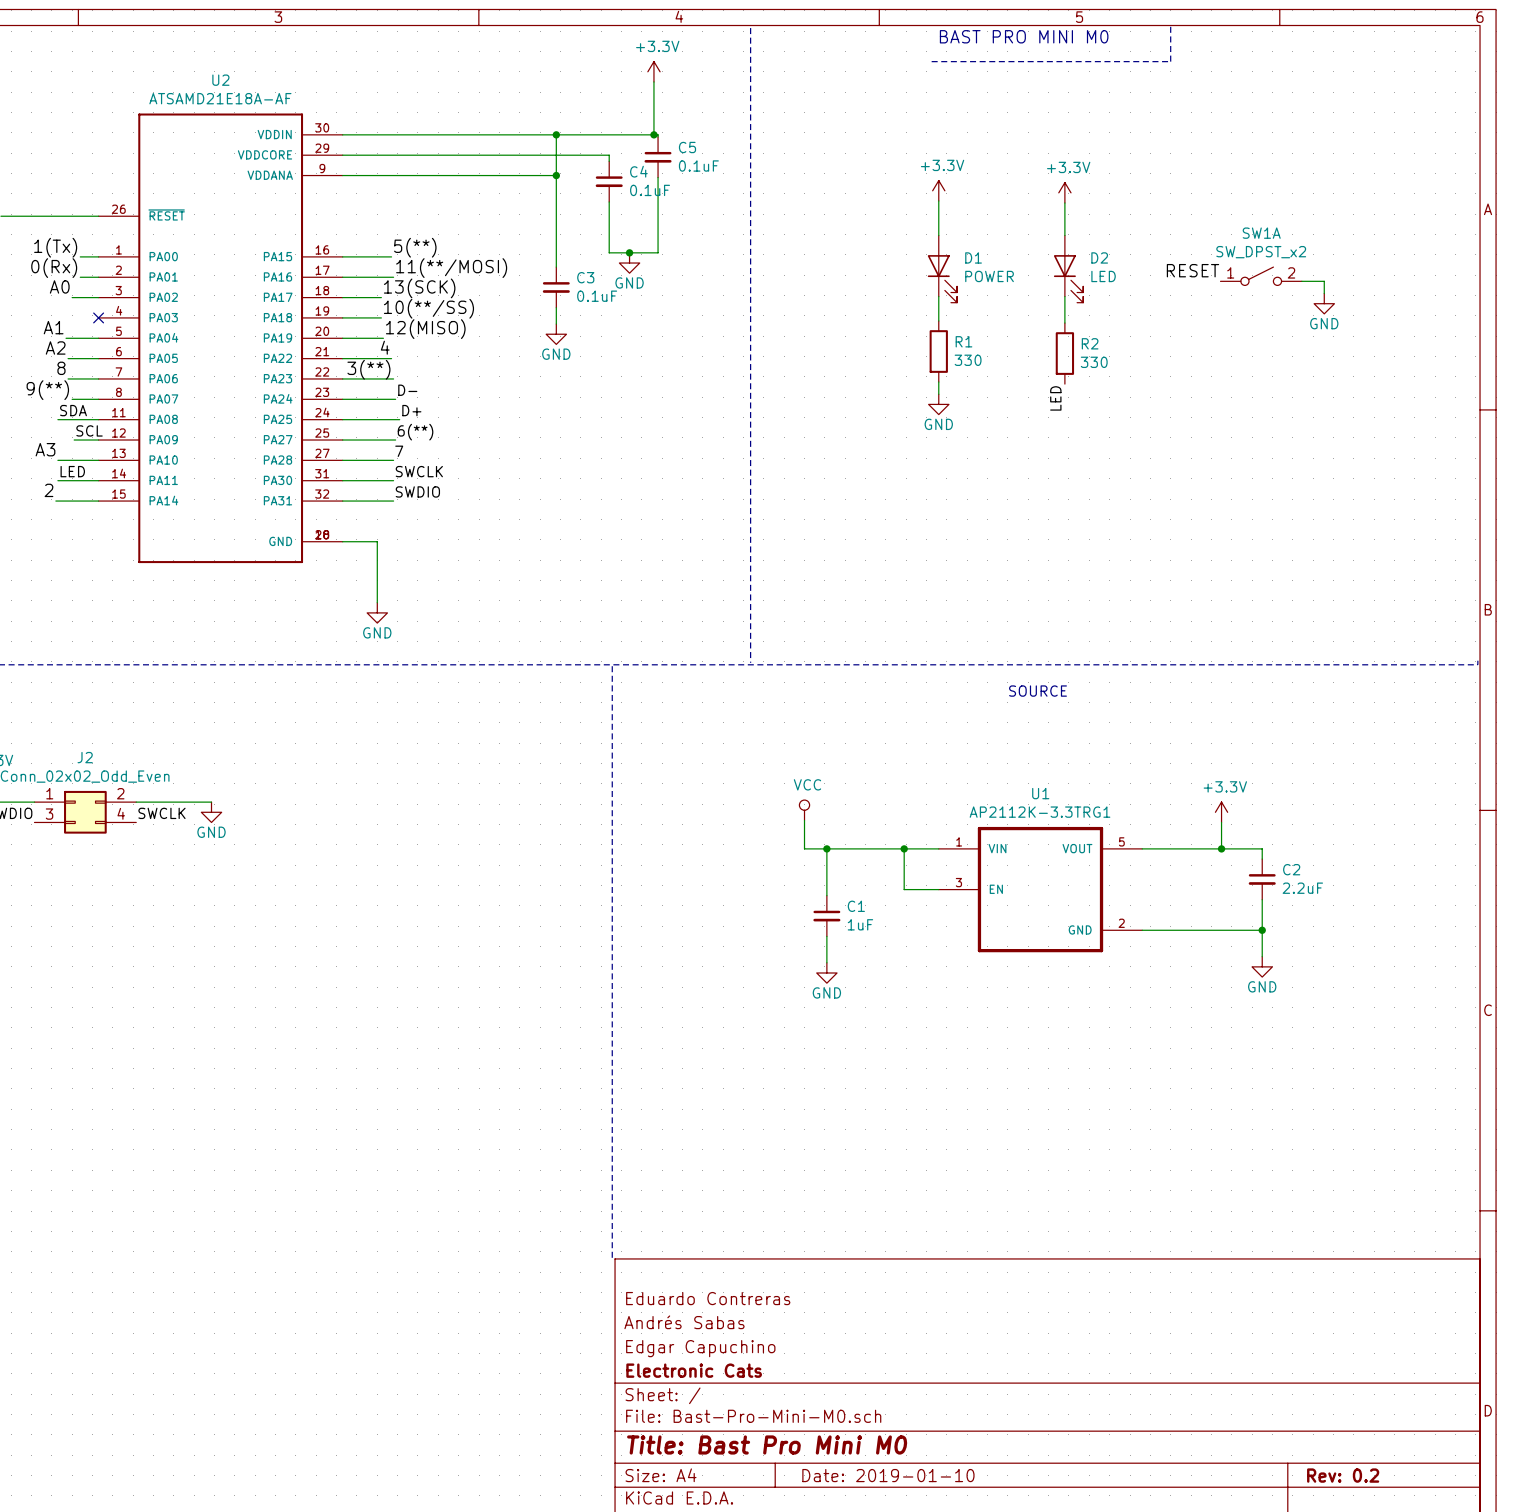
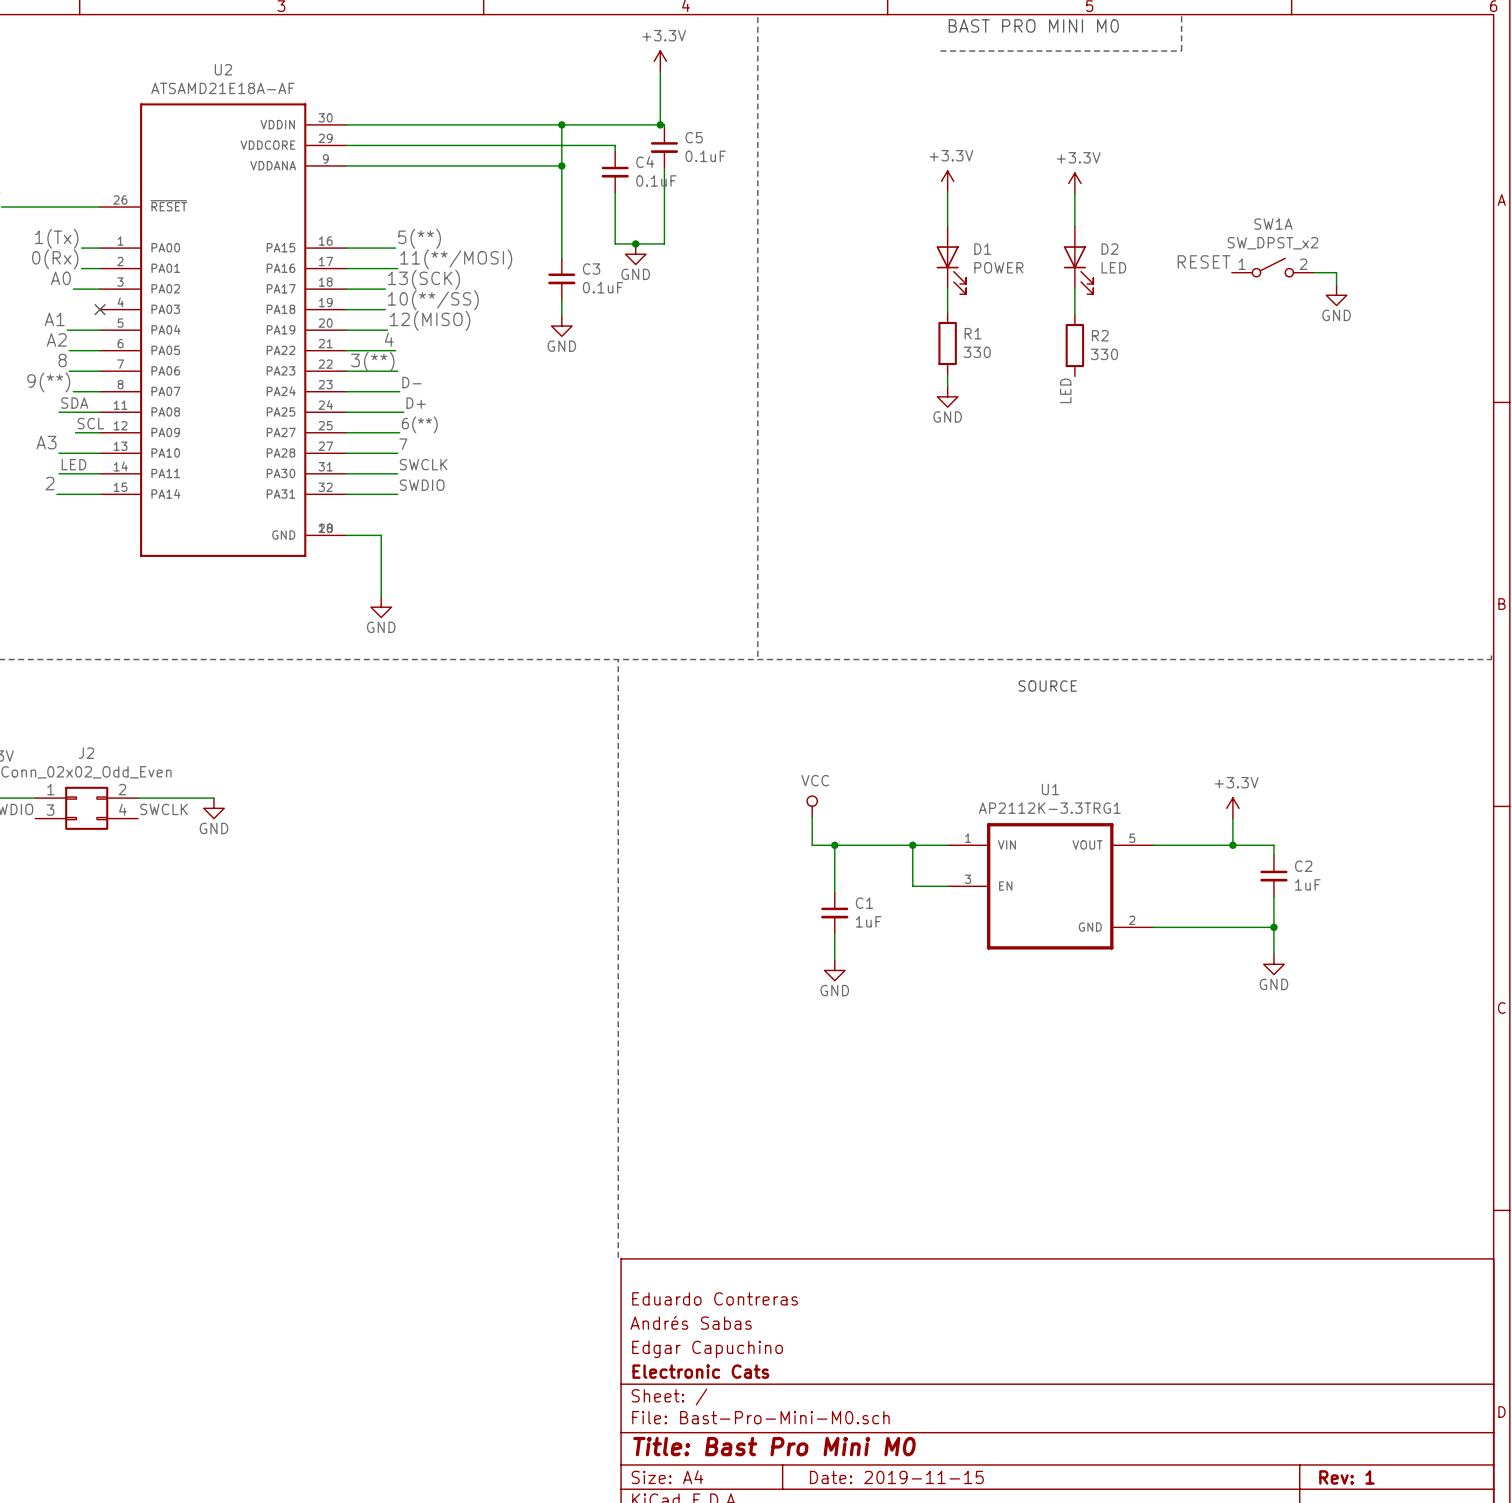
C2 value: 2.2uF (1302, 888) -> 1uF (1307, 884)
title block: Date: 2019-01-10 (888, 1475) -> Date: 2019-11-15 (896, 1477)
title block: Rev: 0.2 (1343, 1475) -> Rev: 1 (1346, 1477)

